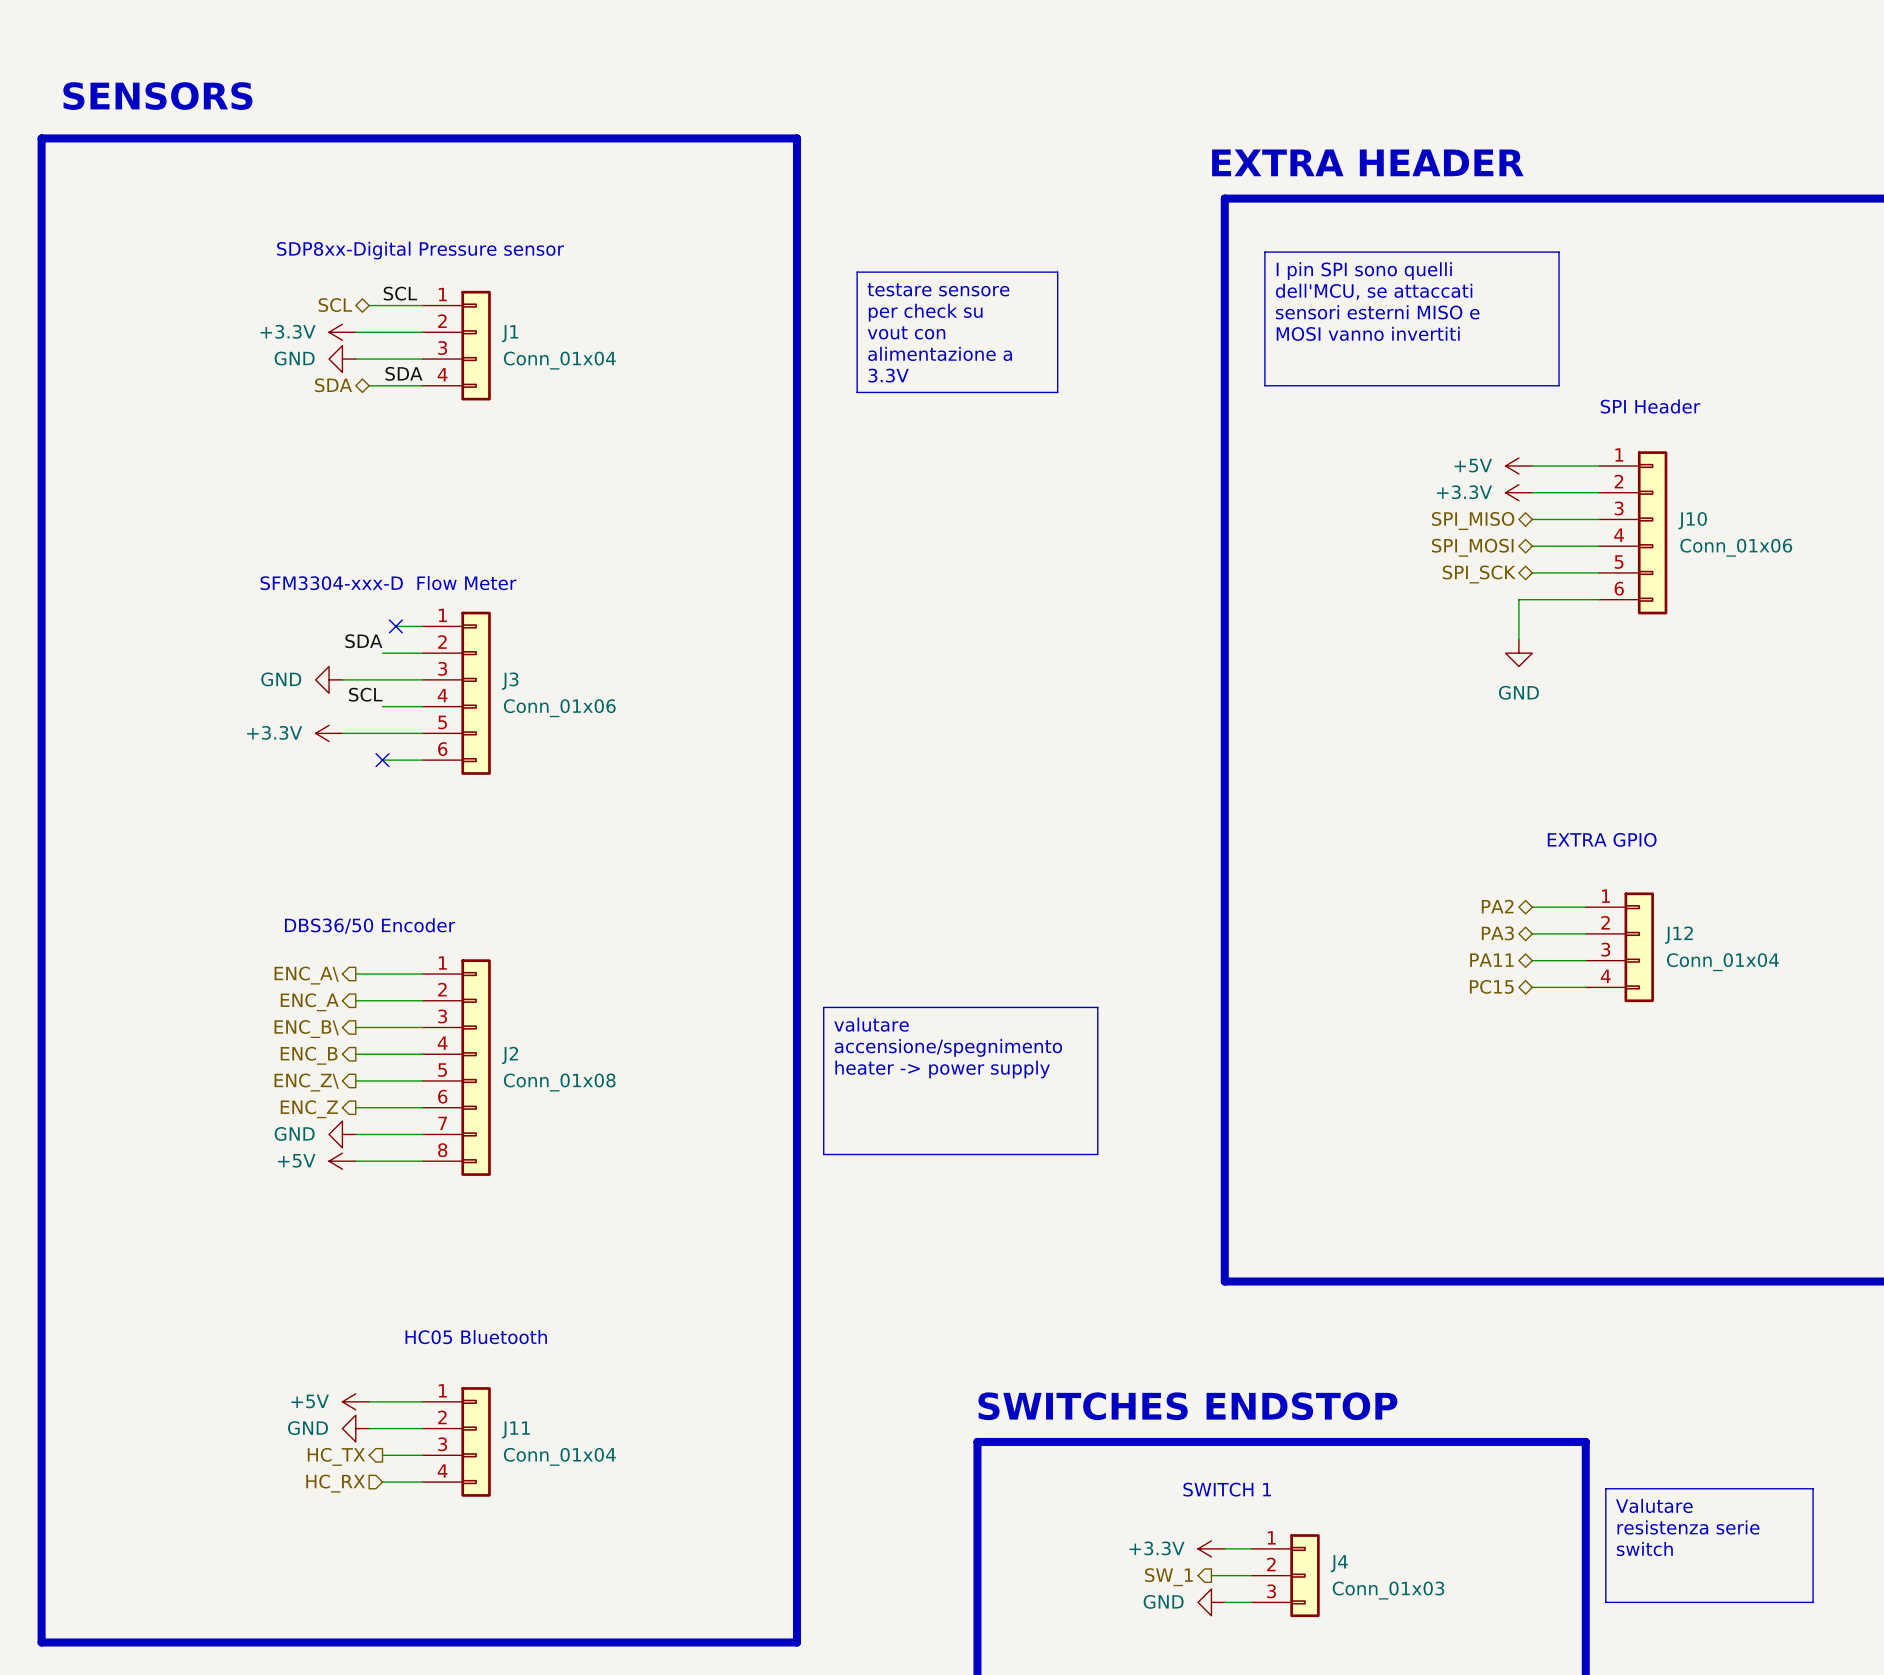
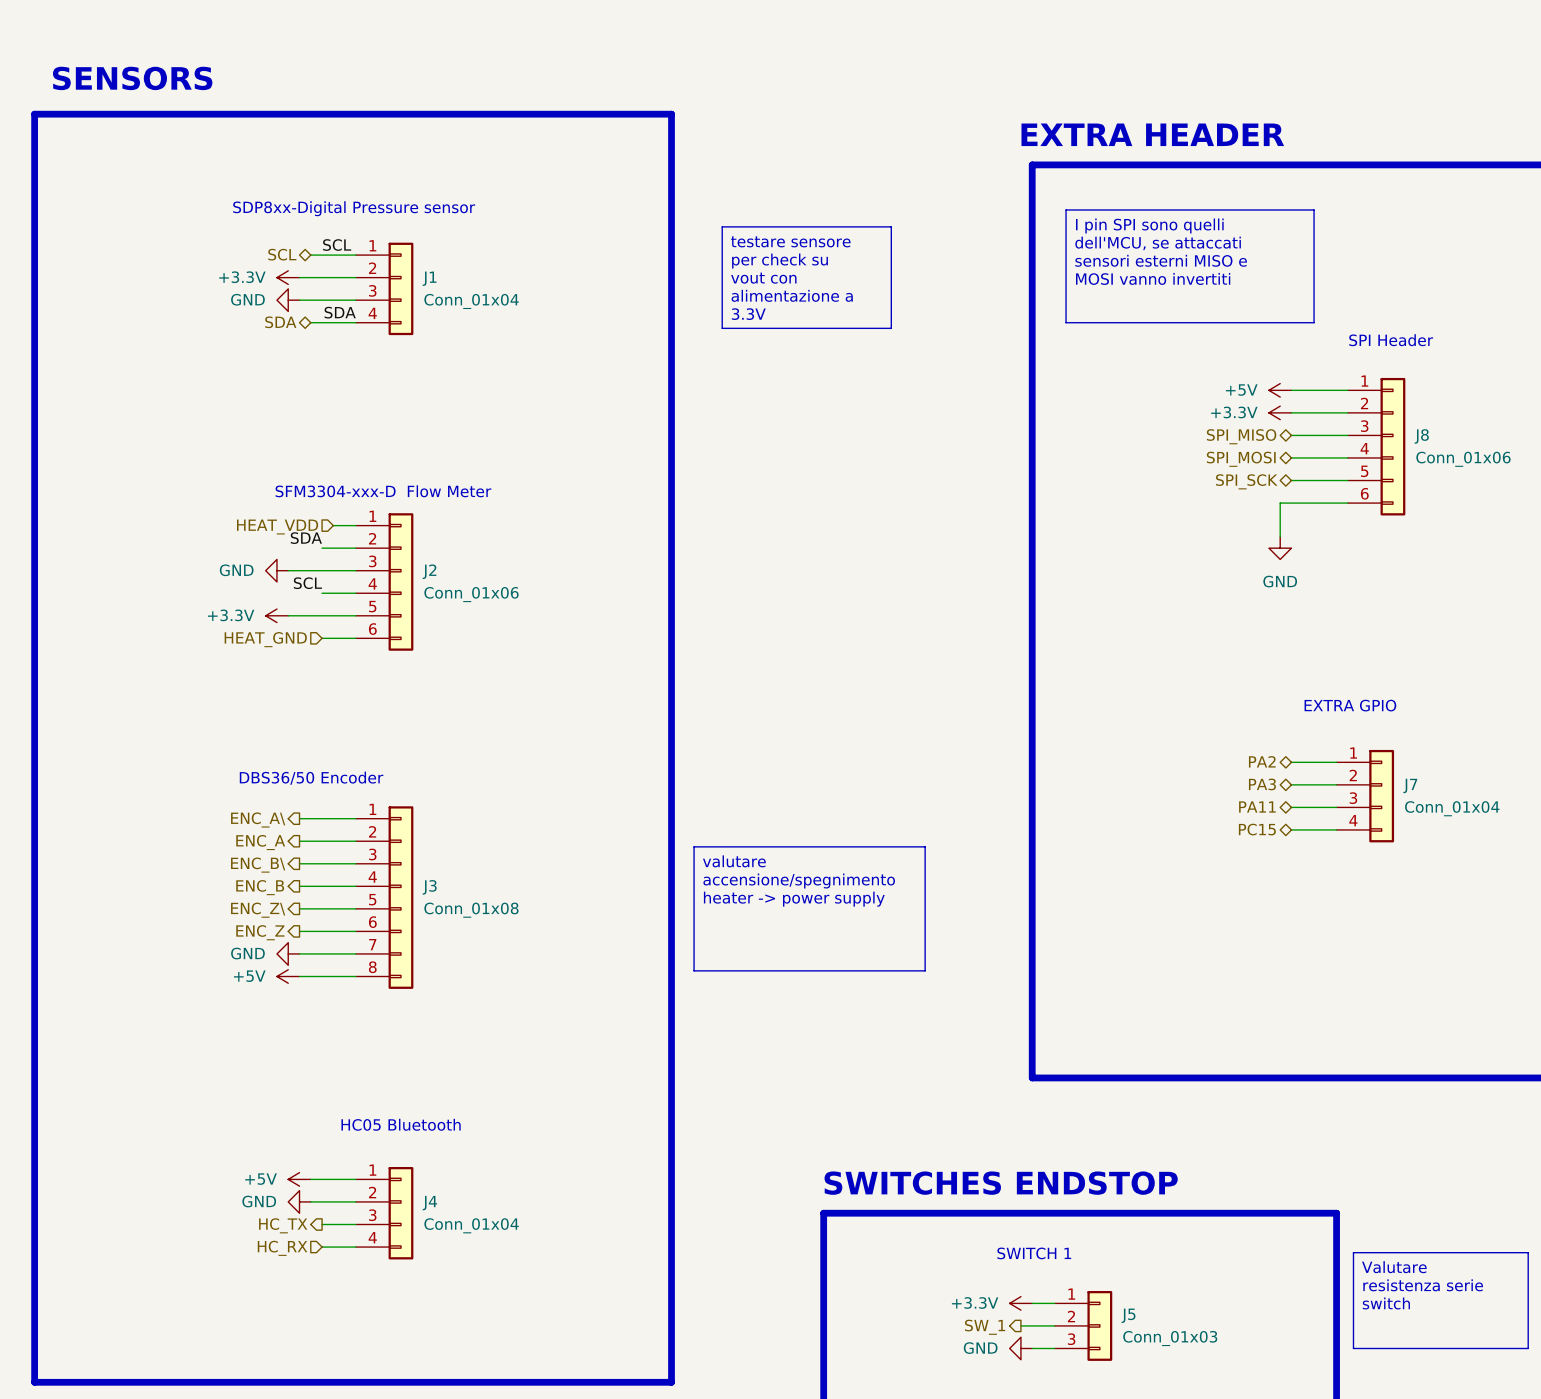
J10 name: J10 (1692, 520) -> J8 (1421, 436)
text position: SFM3304-xxx-D Flow Meter (388, 583) -> SFM3304-xxx-D Flow Meter (383, 491)
no-connect mark: (395, 626) -> none
hierarchical label: none -> HEAT_VDD (277, 527)
J3 name: J3 (510, 681) -> J2 (429, 571)
no-connect mark: (382, 760) -> none
hierarchical label: none -> HEAT_GND (265, 639)
J12 name: J12 (1678, 935) -> J7 (1410, 786)
J2 name: J2 (509, 1055) -> J3 (429, 887)
J11 name: J11 (515, 1429) -> J4 (429, 1203)
J4 name: J4 (1339, 1563) -> J5 (1128, 1315)

